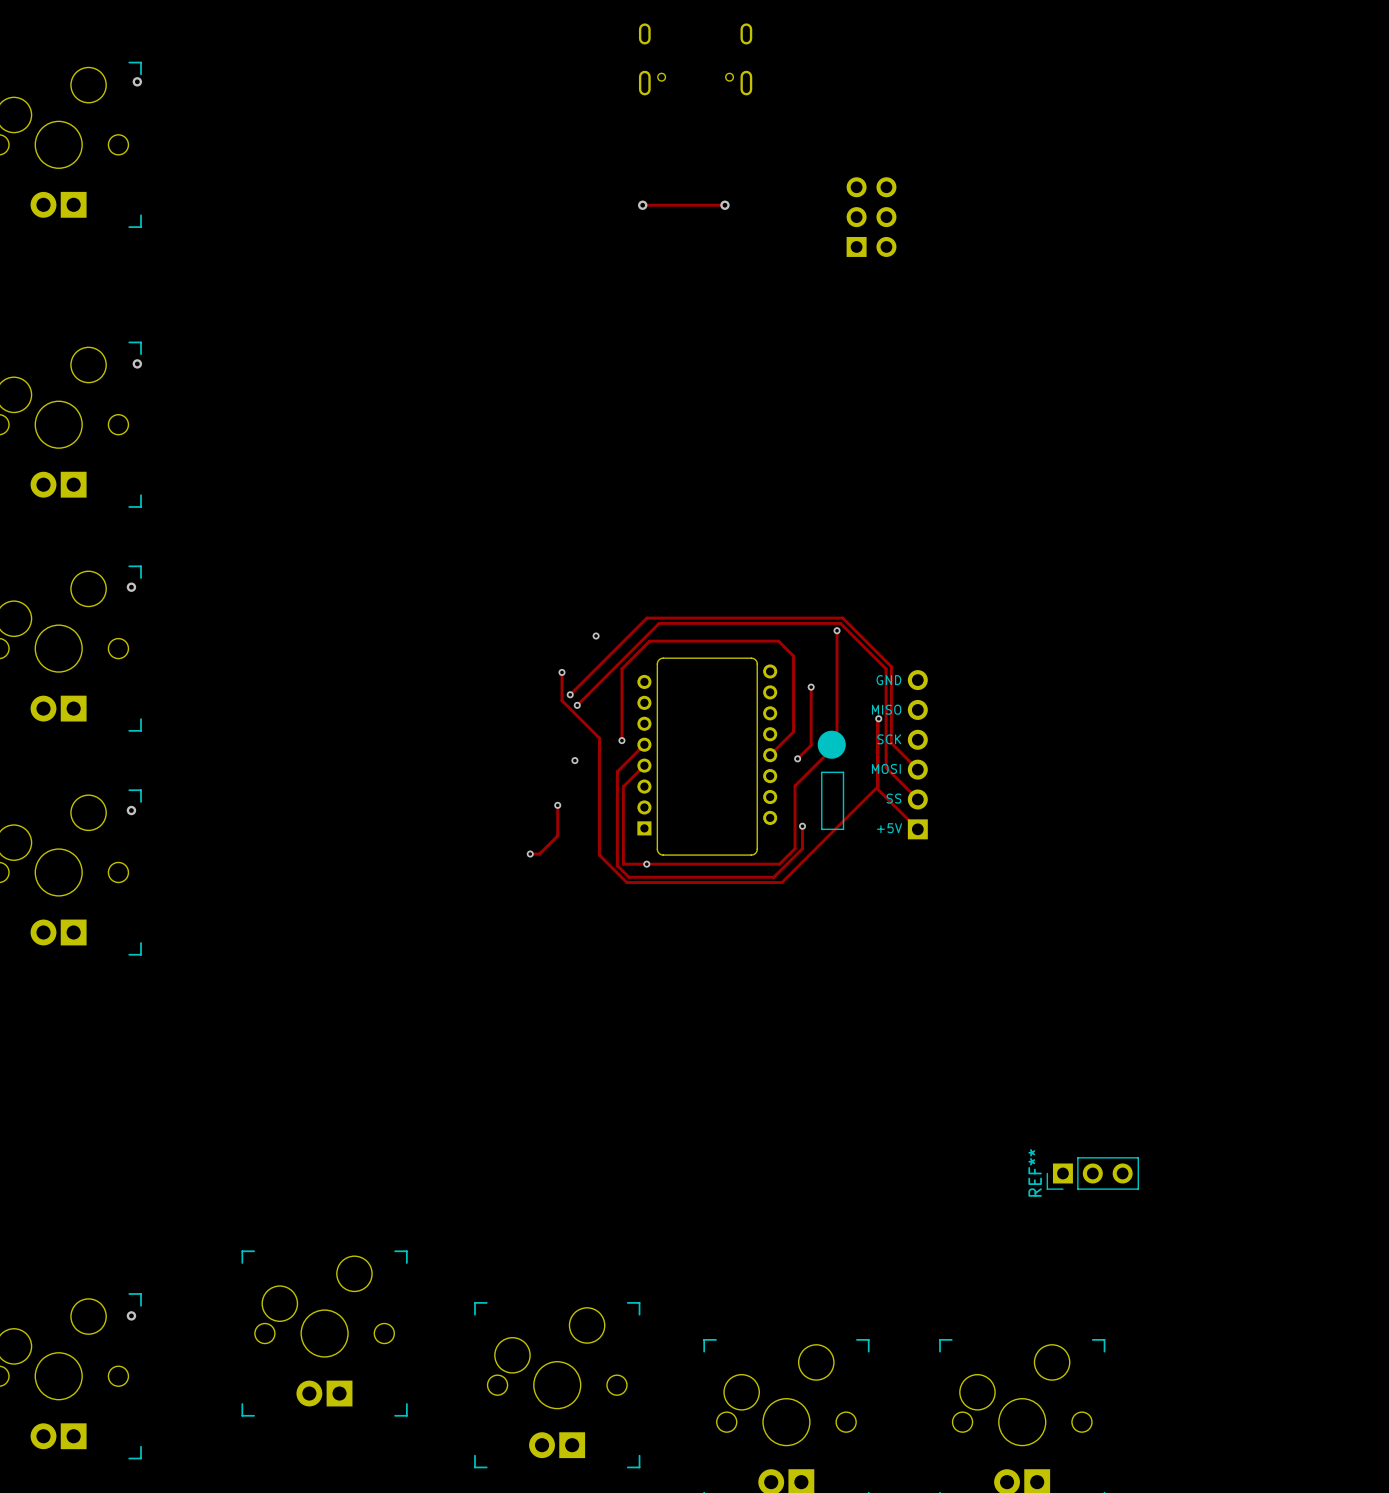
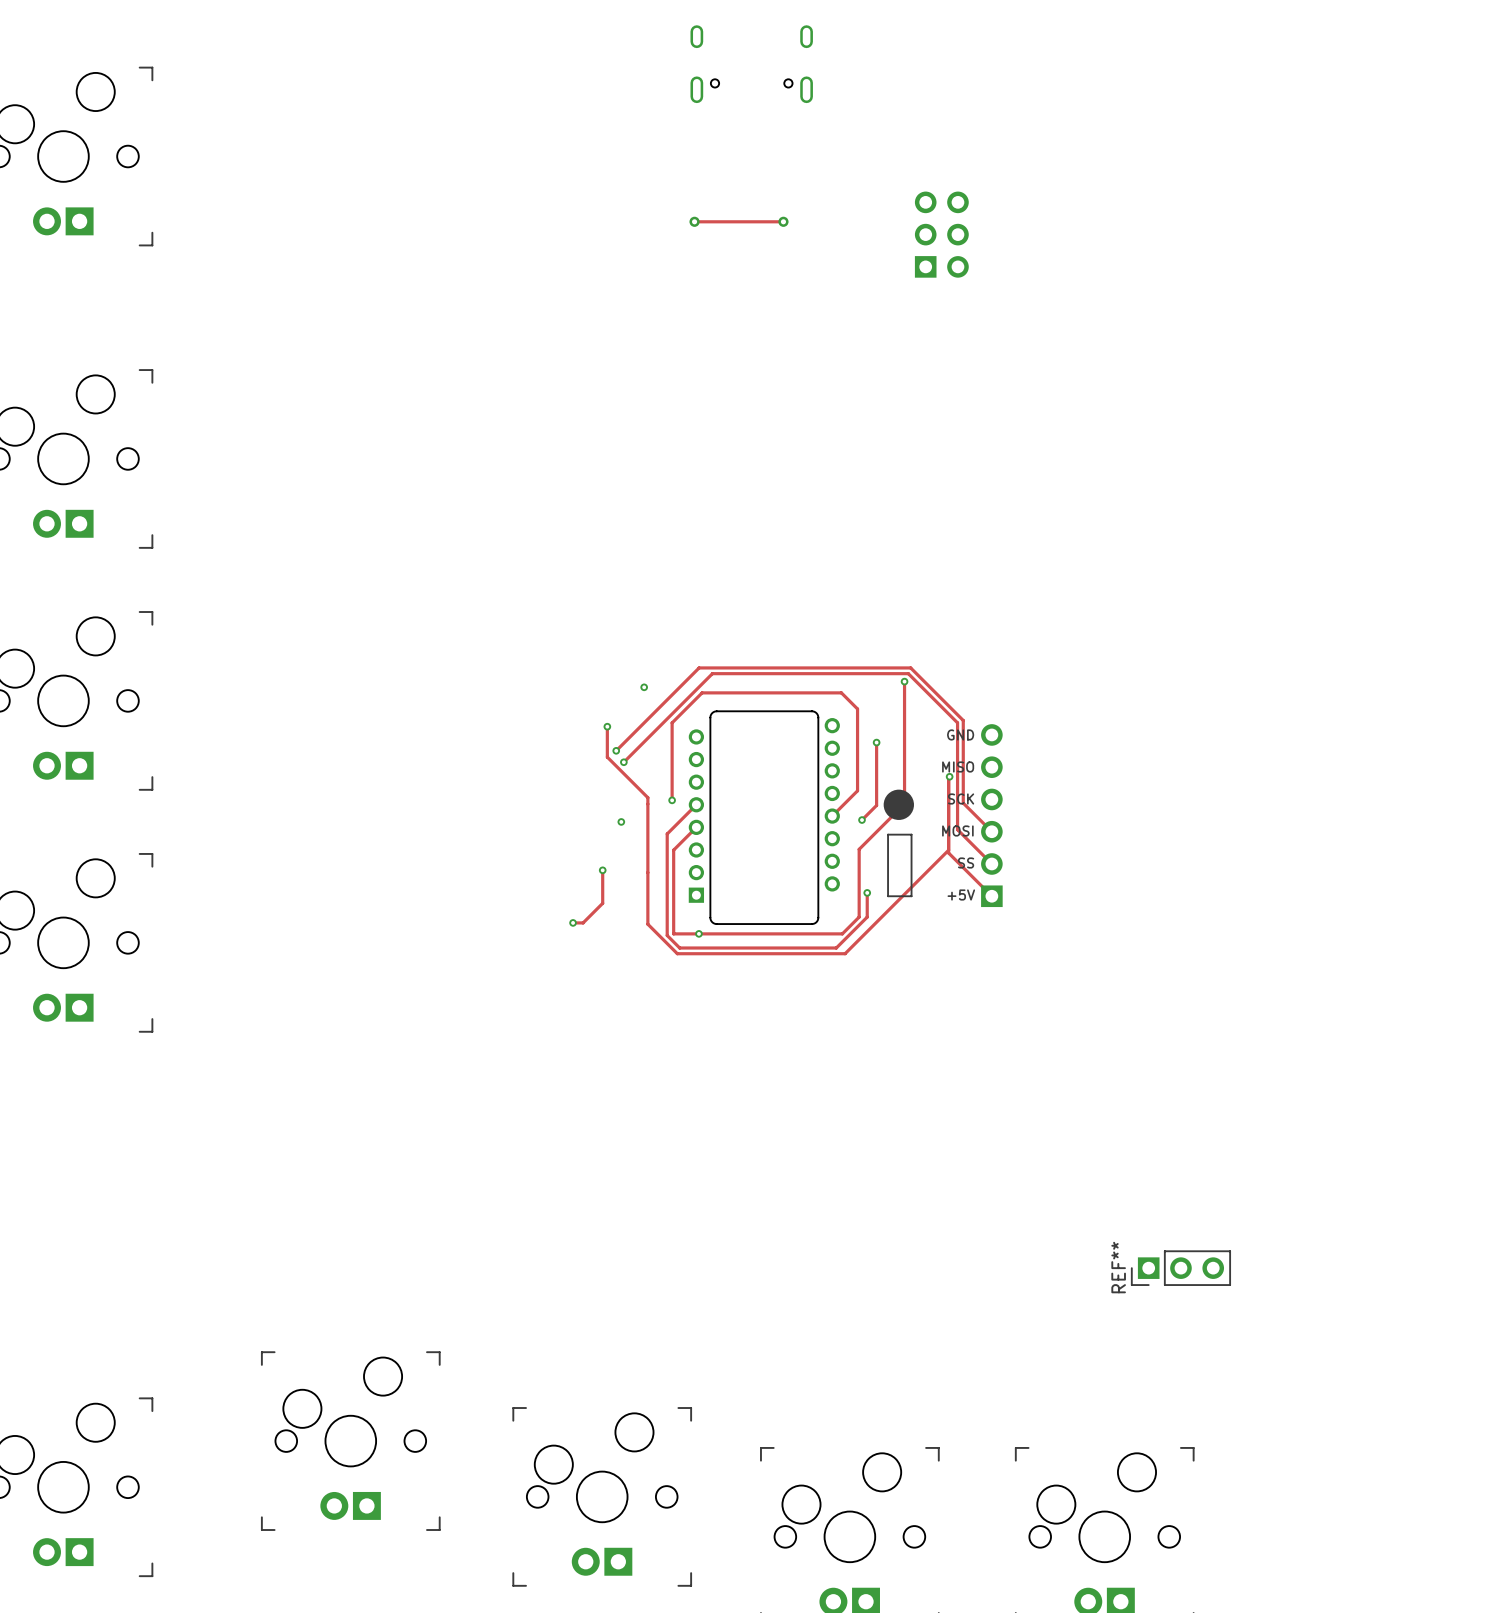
via: (137, 81) -> none
via: (137, 363) -> none
via: (131, 587) -> none
via: (131, 810) -> none
via: (131, 1315) -> none

